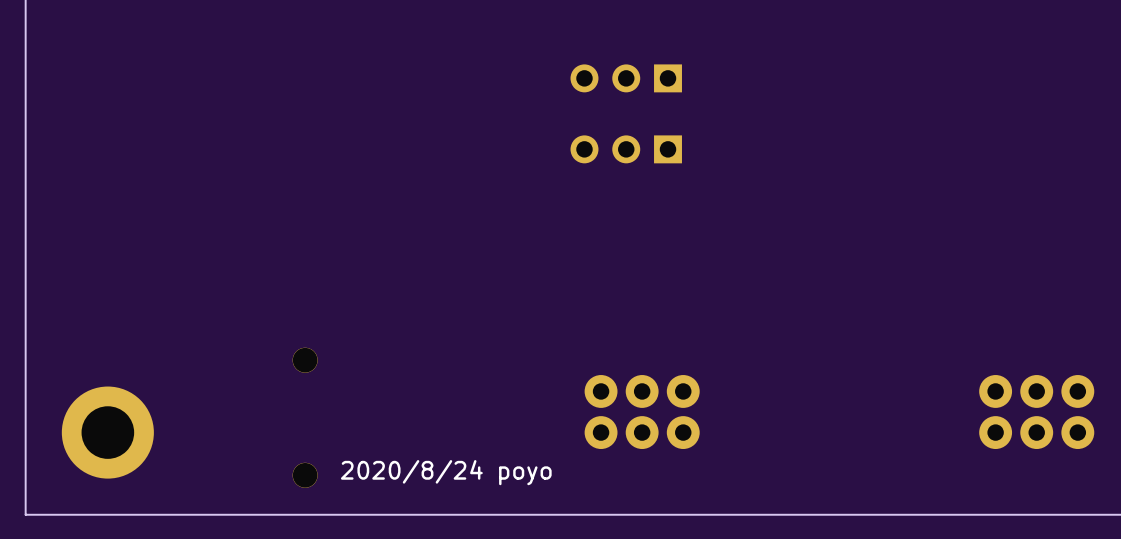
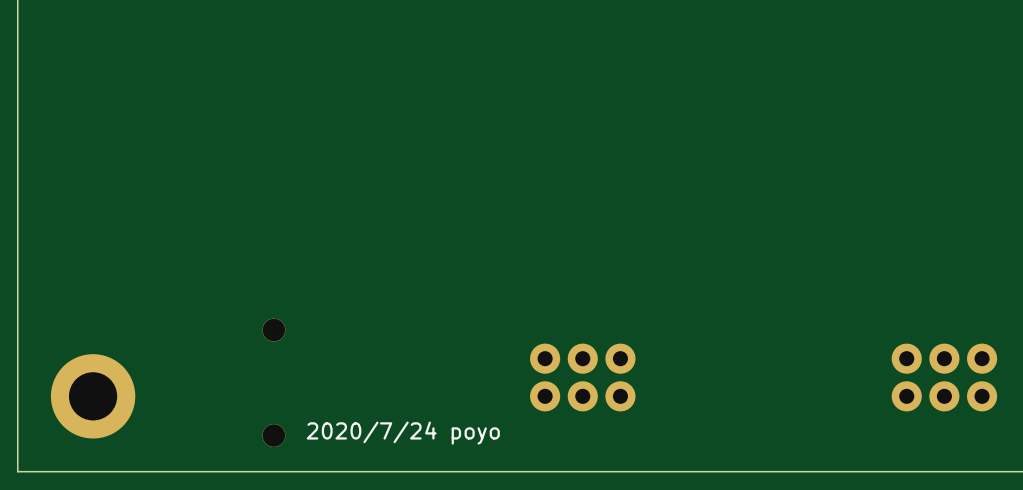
part: (626, 78) -> none
part: (626, 149) -> none
text: 2020/8/24 poyo (446, 472) -> 2020/7/24 poyo (403, 433)

